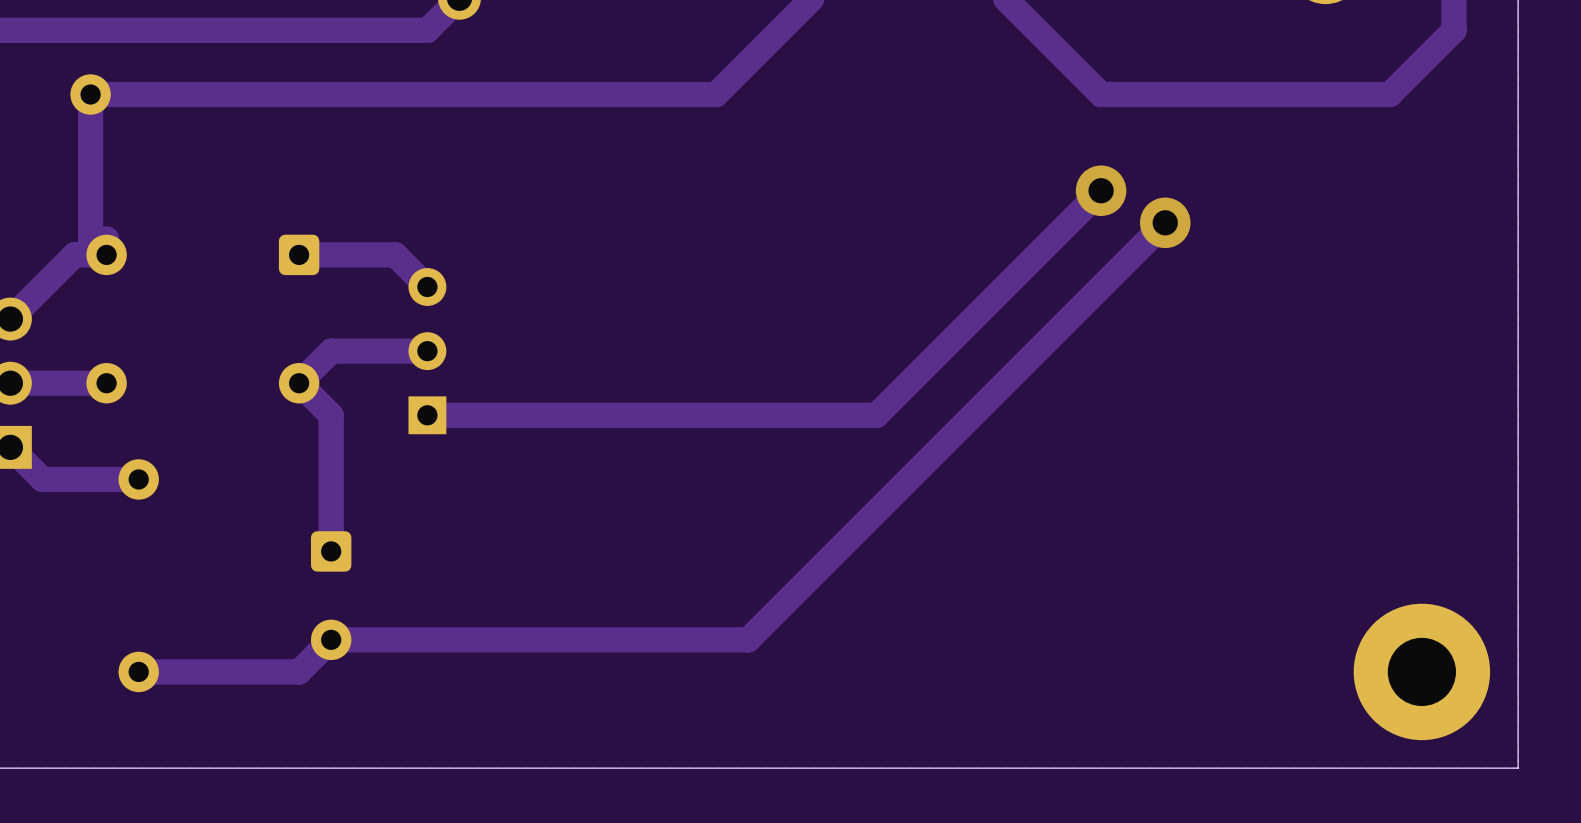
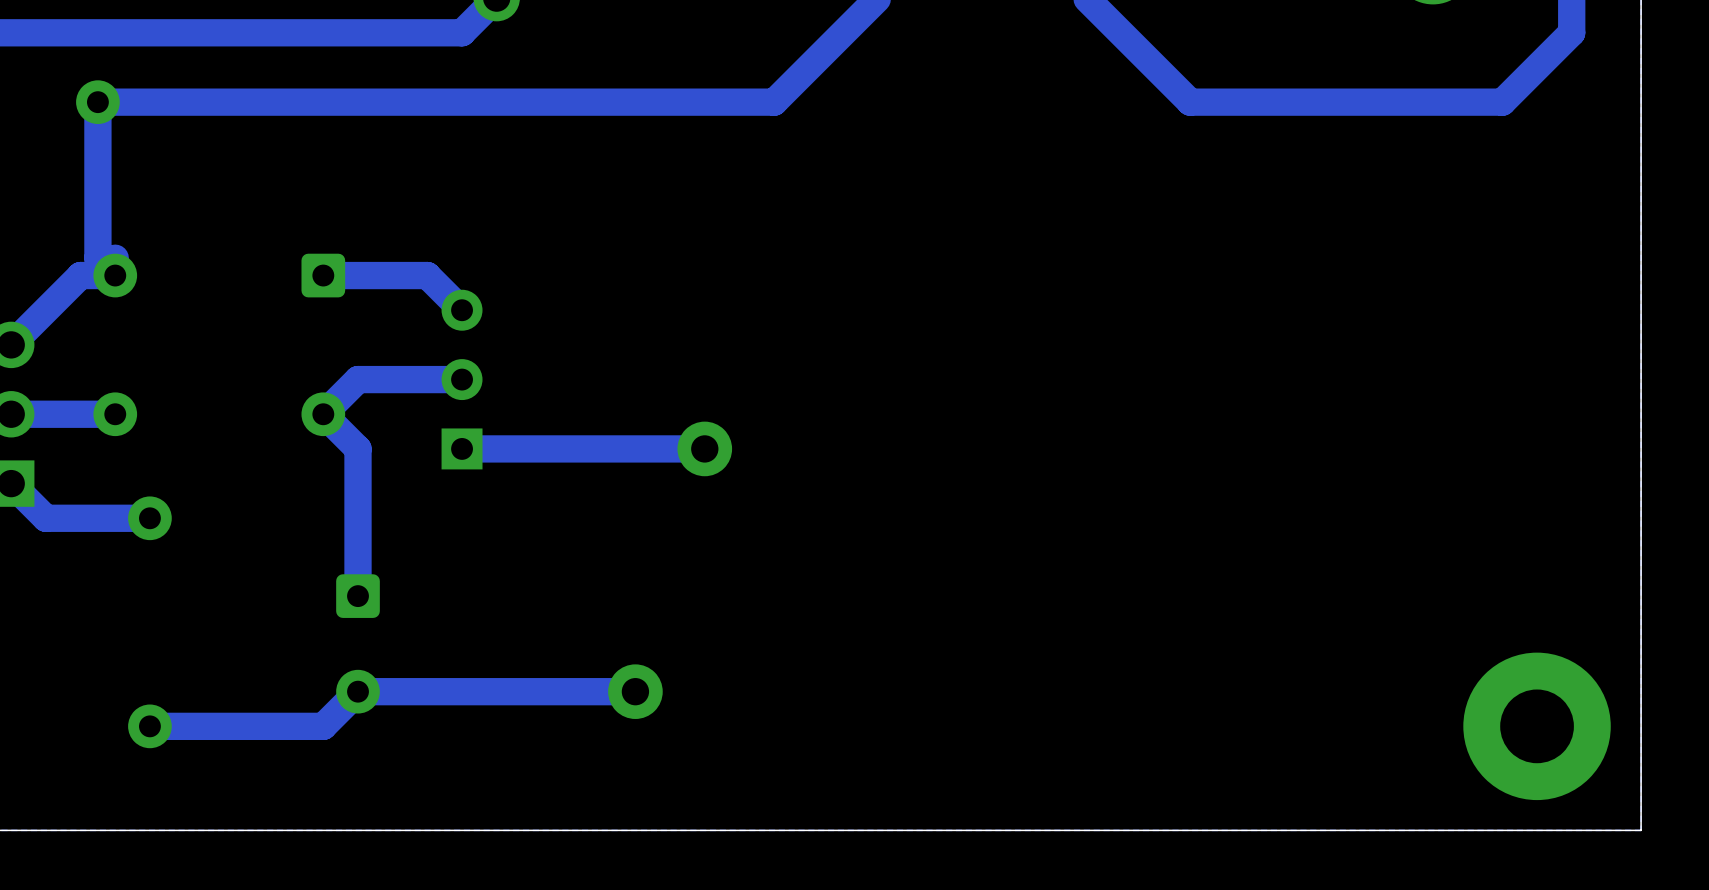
track: (1101, 190) (876, 415) (651, 415) -> none
via: (1101, 190) -> none
track: (1165, 222) (748, 639) (587, 639) -> none
via: (1165, 222) -> none
via: none -> (704, 448)
via: none -> (635, 691)

